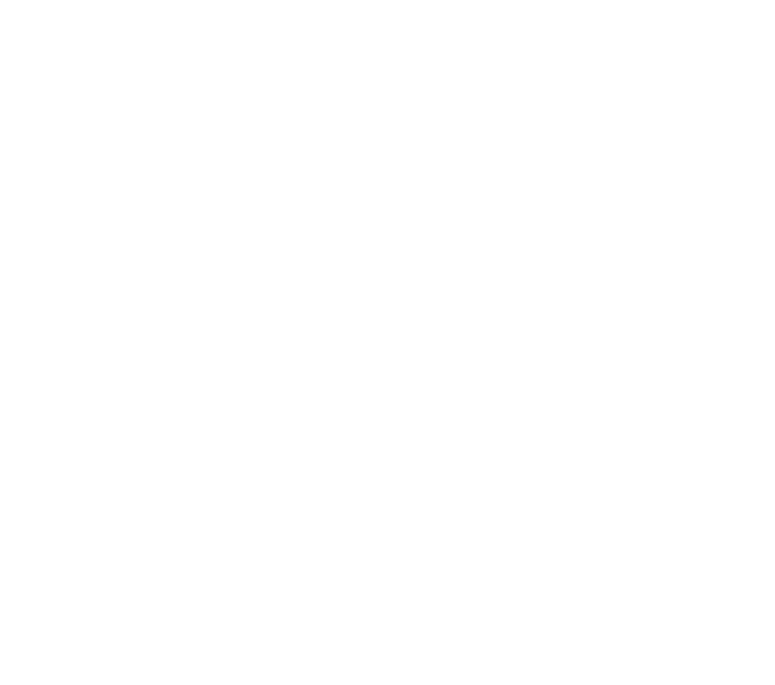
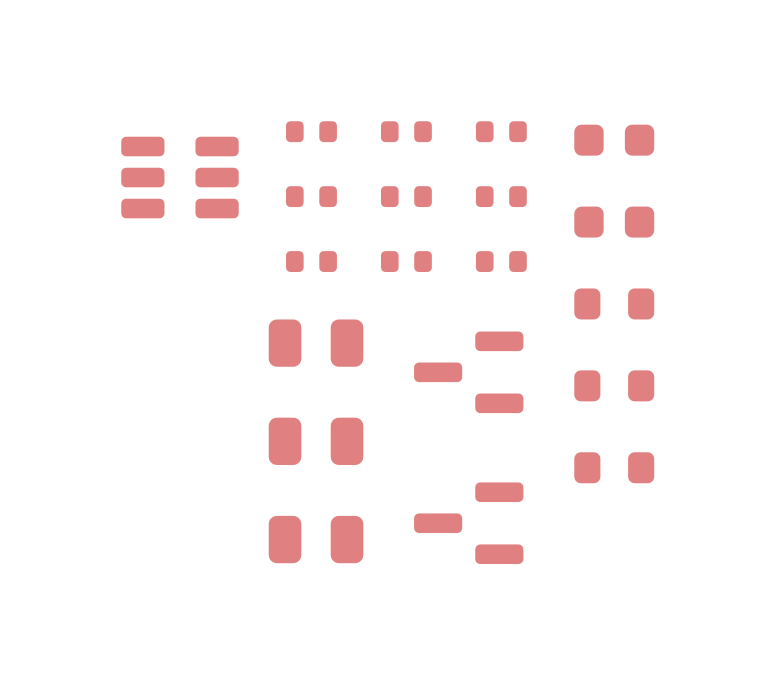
part: none -> (311, 131)
part: none -> (406, 131)
part: none -> (501, 131)
part: none -> (614, 140)
part: none -> (179, 177)
part: none -> (311, 196)
part: none -> (406, 196)
part: none -> (501, 196)
part: none -> (614, 222)
part: none -> (311, 261)
part: none -> (406, 261)
part: none -> (501, 261)
part: none -> (614, 303)
part: none -> (316, 343)
part: none -> (468, 372)
part: none -> (614, 385)
part: none -> (316, 441)
part: none -> (614, 467)
part: none -> (468, 523)
part: none -> (316, 539)

